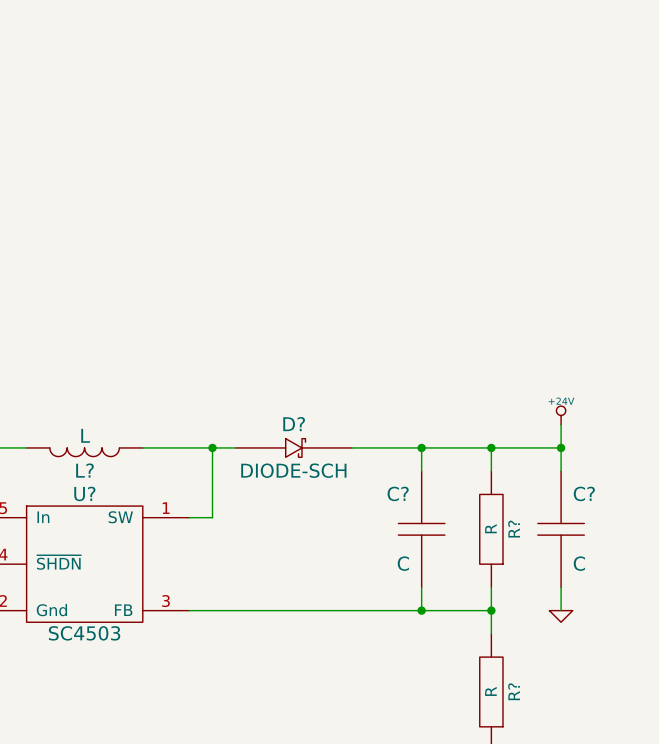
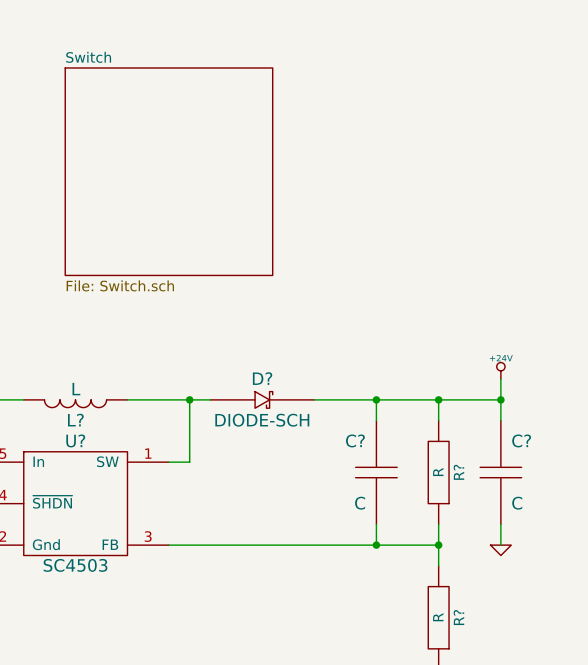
sheet Switch: none -> File: Switch.sch (168, 171)

